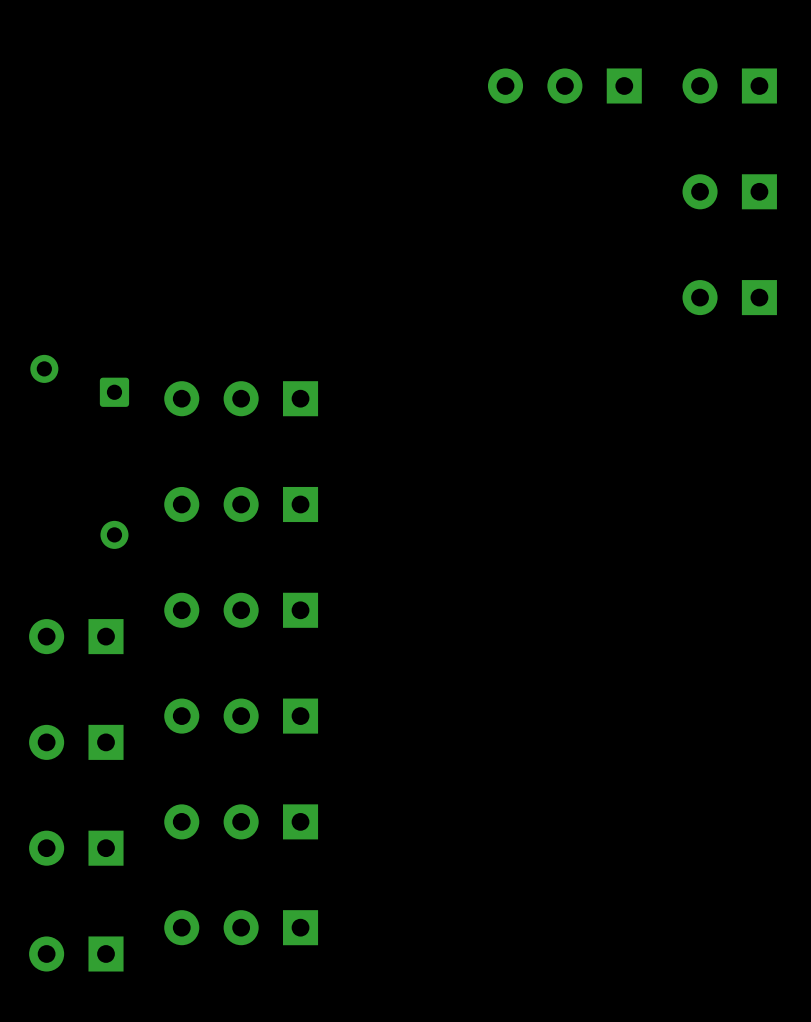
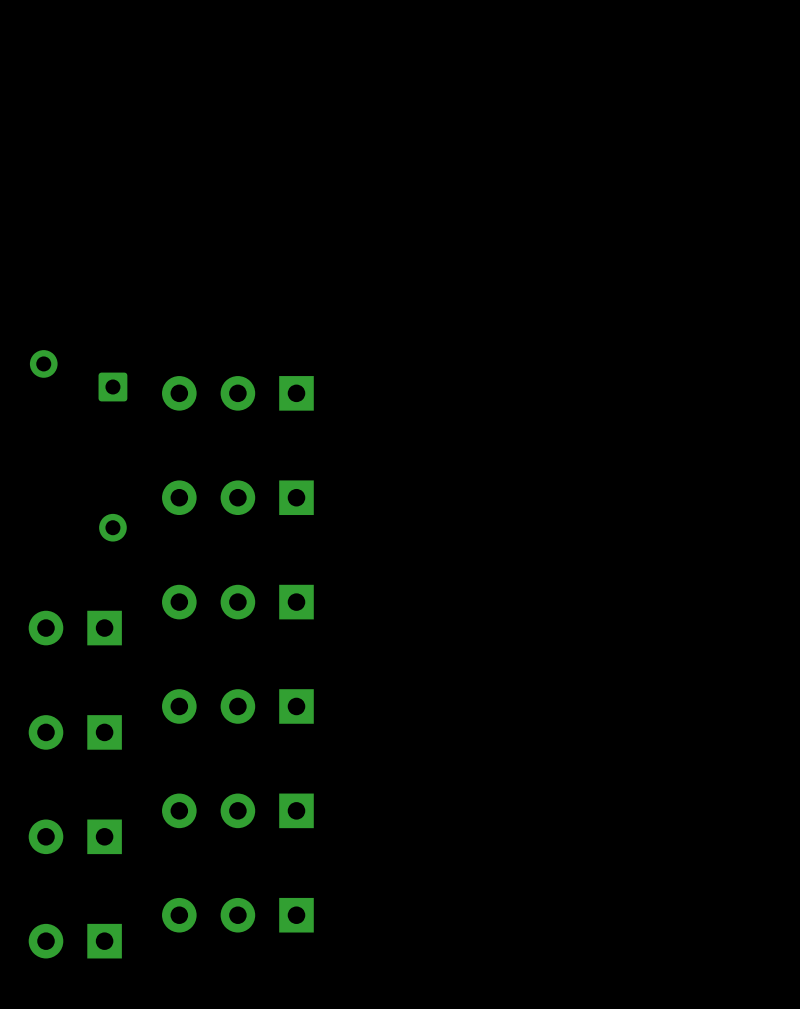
part: (564, 85) -> none
part: (729, 85) -> none
part: (729, 191) -> none
part: (729, 297) -> none

